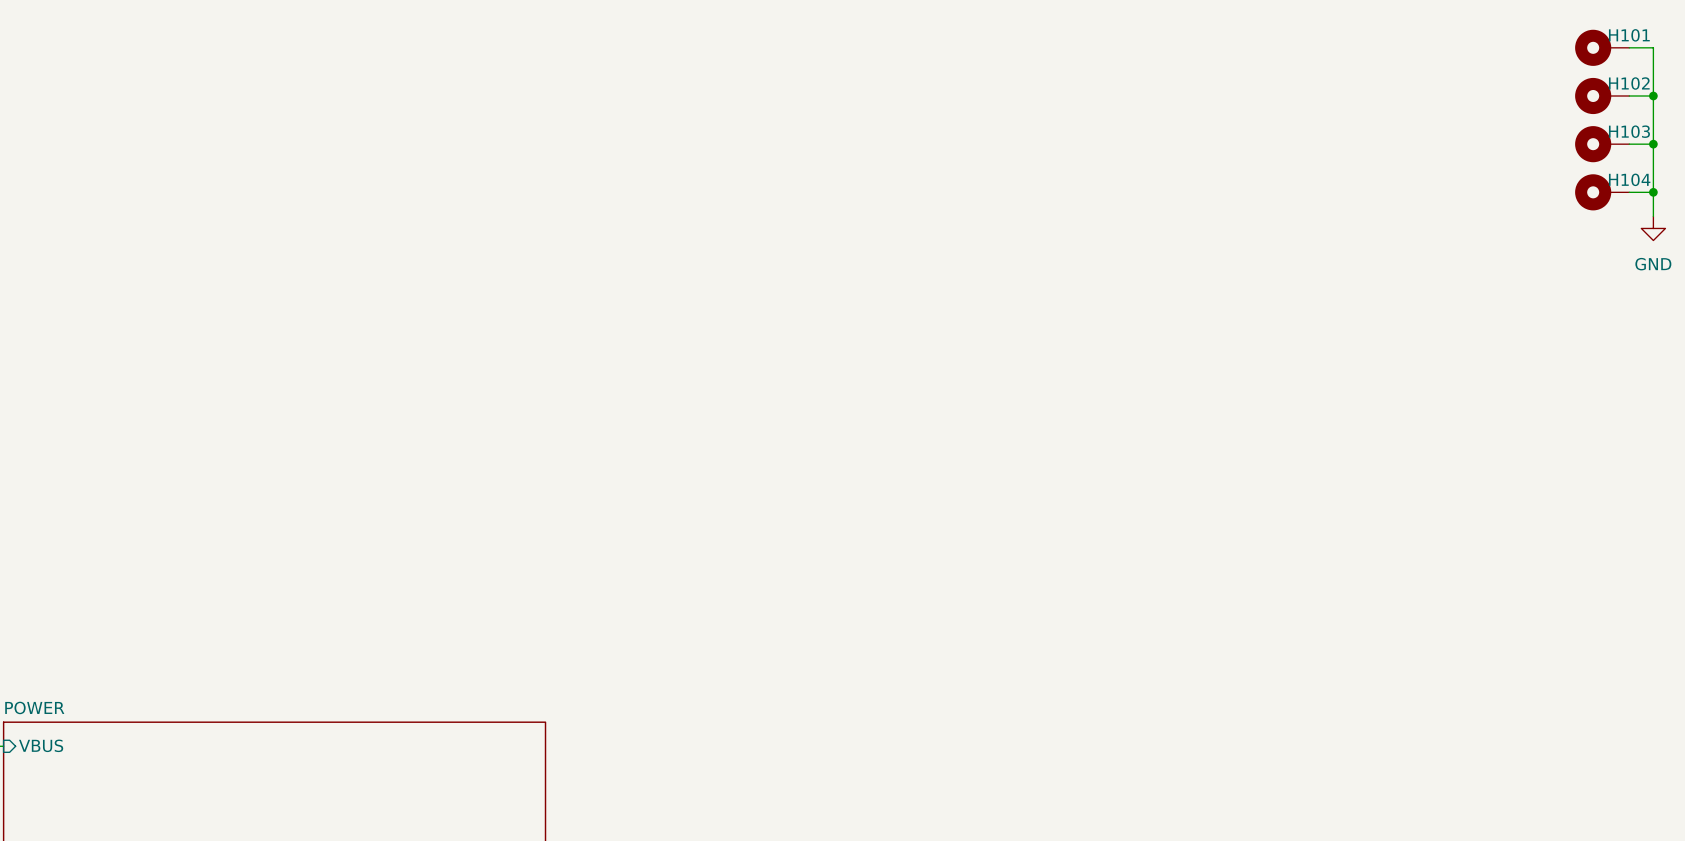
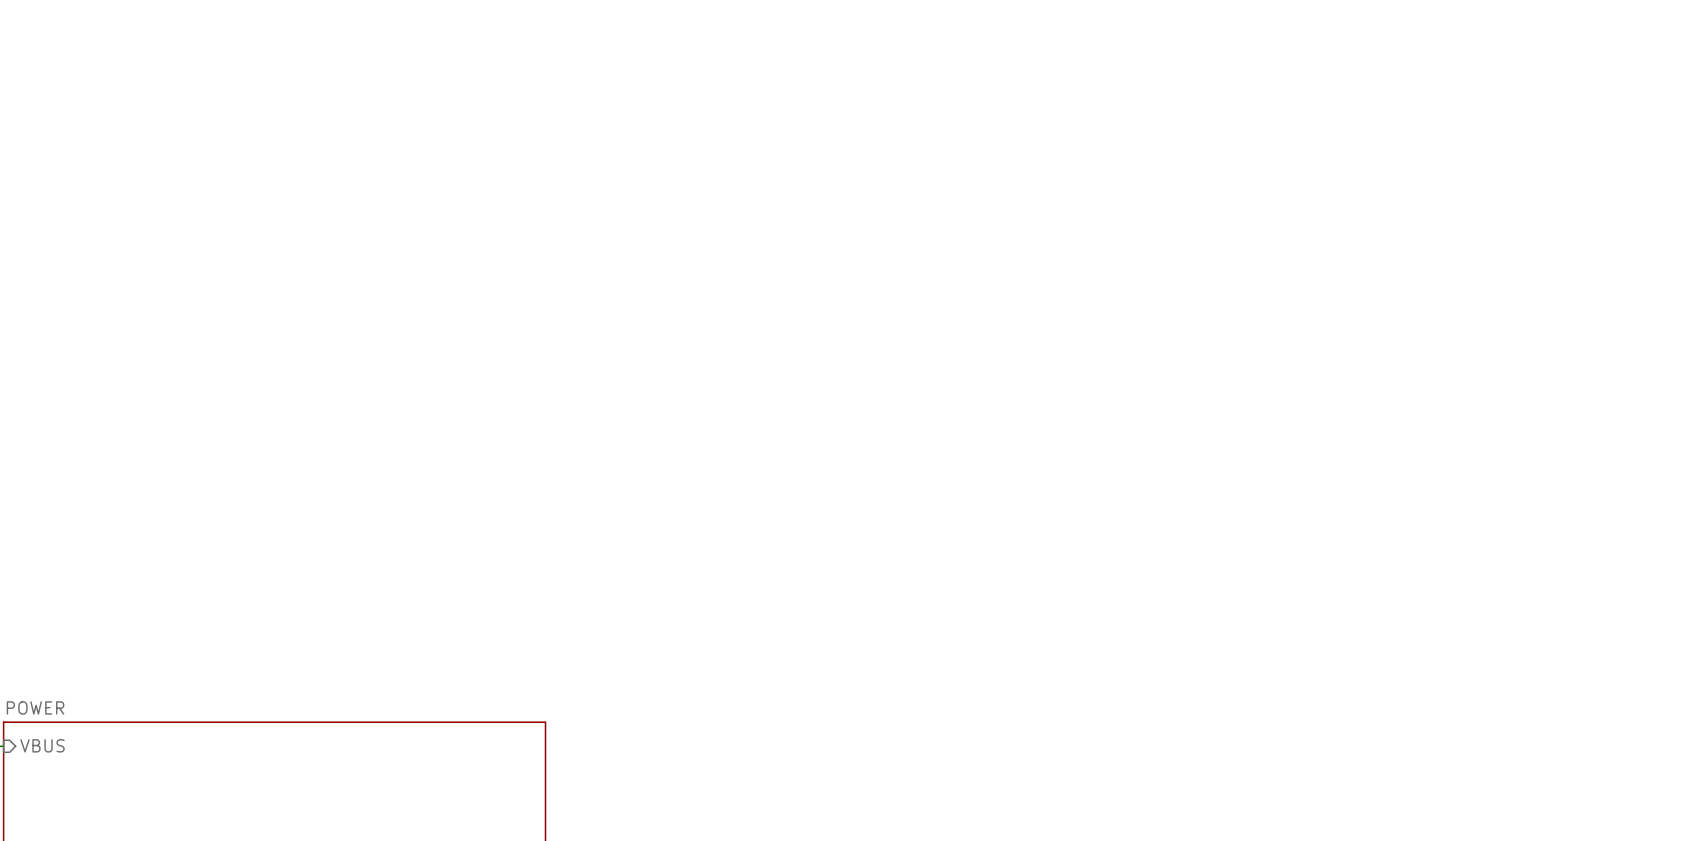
H101: (1602, 47) -> none
wire: (1629, 47) (1653, 47) (1653, 216) -> none
H102: (1602, 96) -> none
wire: (1629, 96) (1653, 96) -> none
junction: (1653, 96) -> none
H103: (1602, 144) -> none
wire: (1629, 144) (1653, 144) -> none
junction: (1653, 144) -> none
H104: (1602, 192) -> none
wire: (1629, 192) (1653, 192) -> none
junction: (1653, 192) -> none
power symbol: GND (1653, 228) -> none

